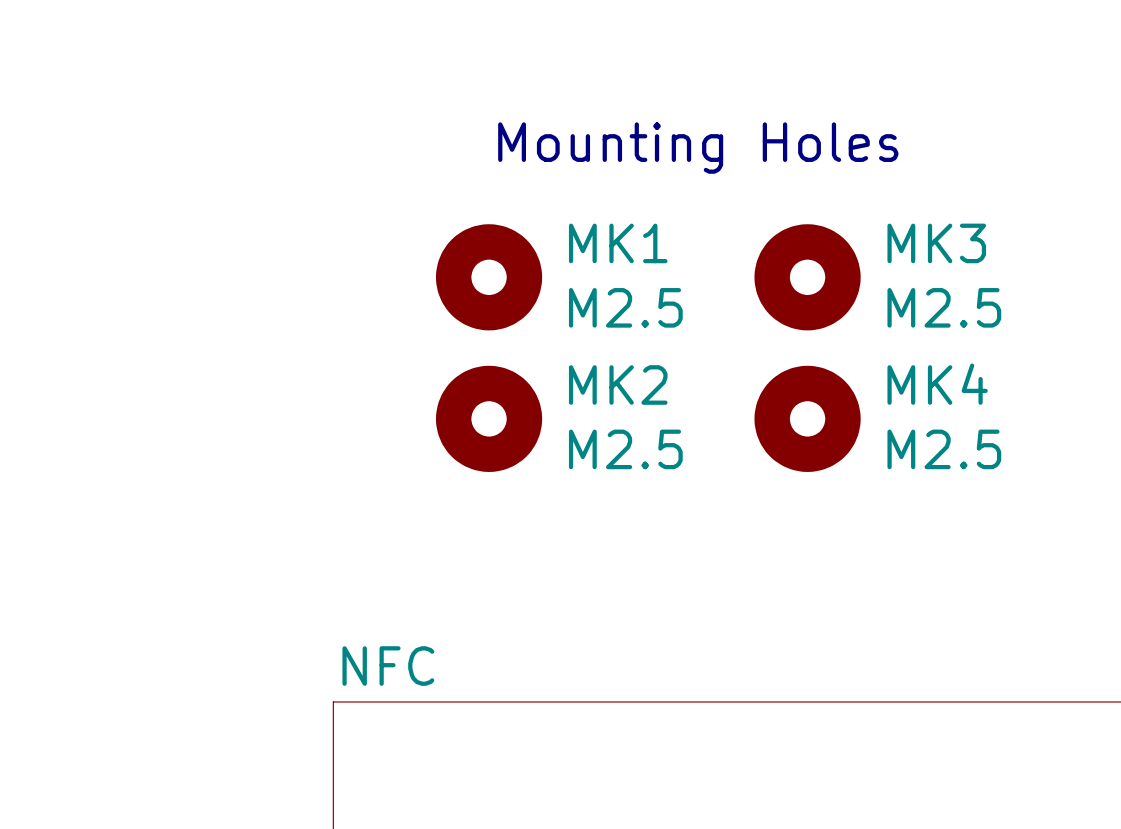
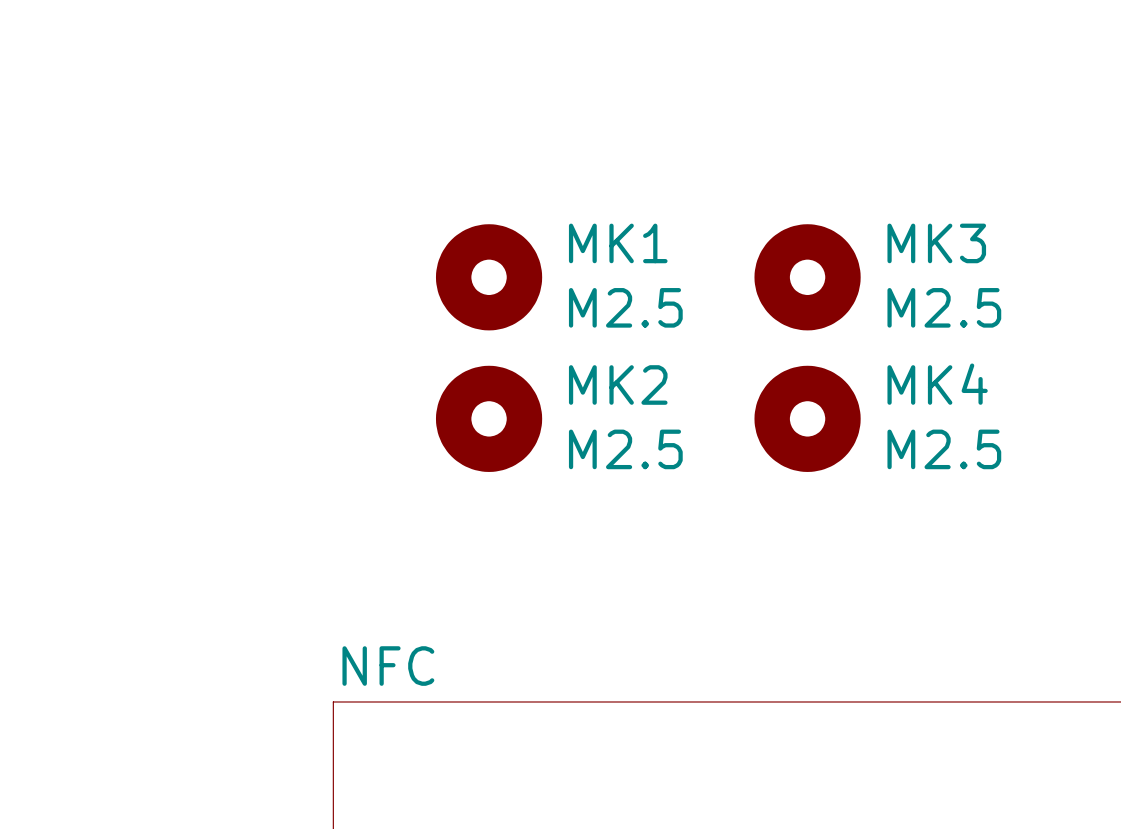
text: Mounting Holes (698, 148) -> none

